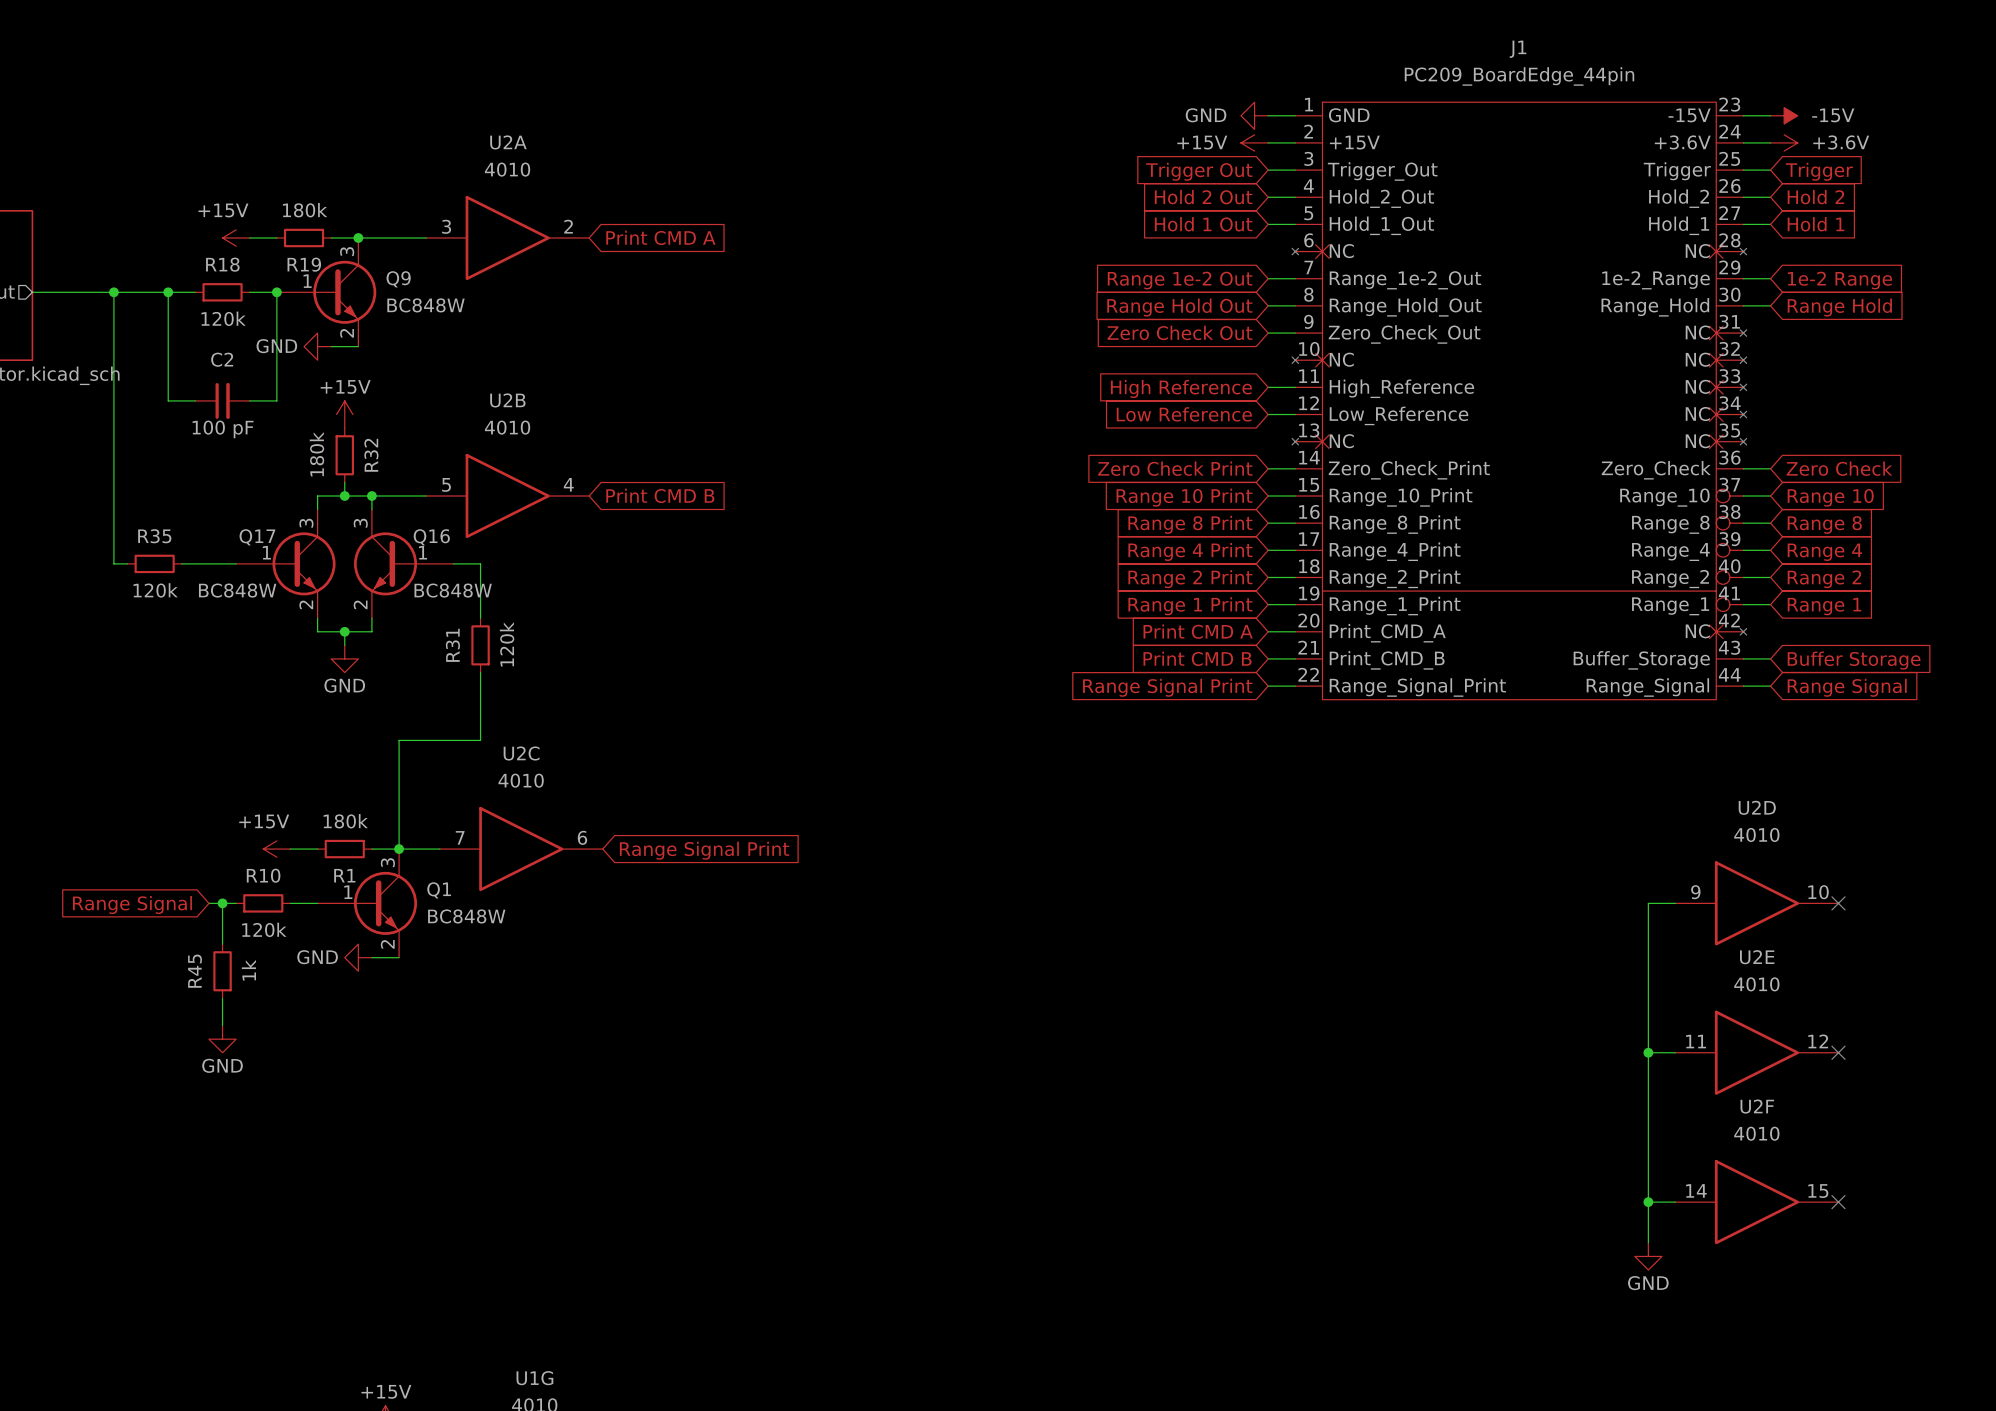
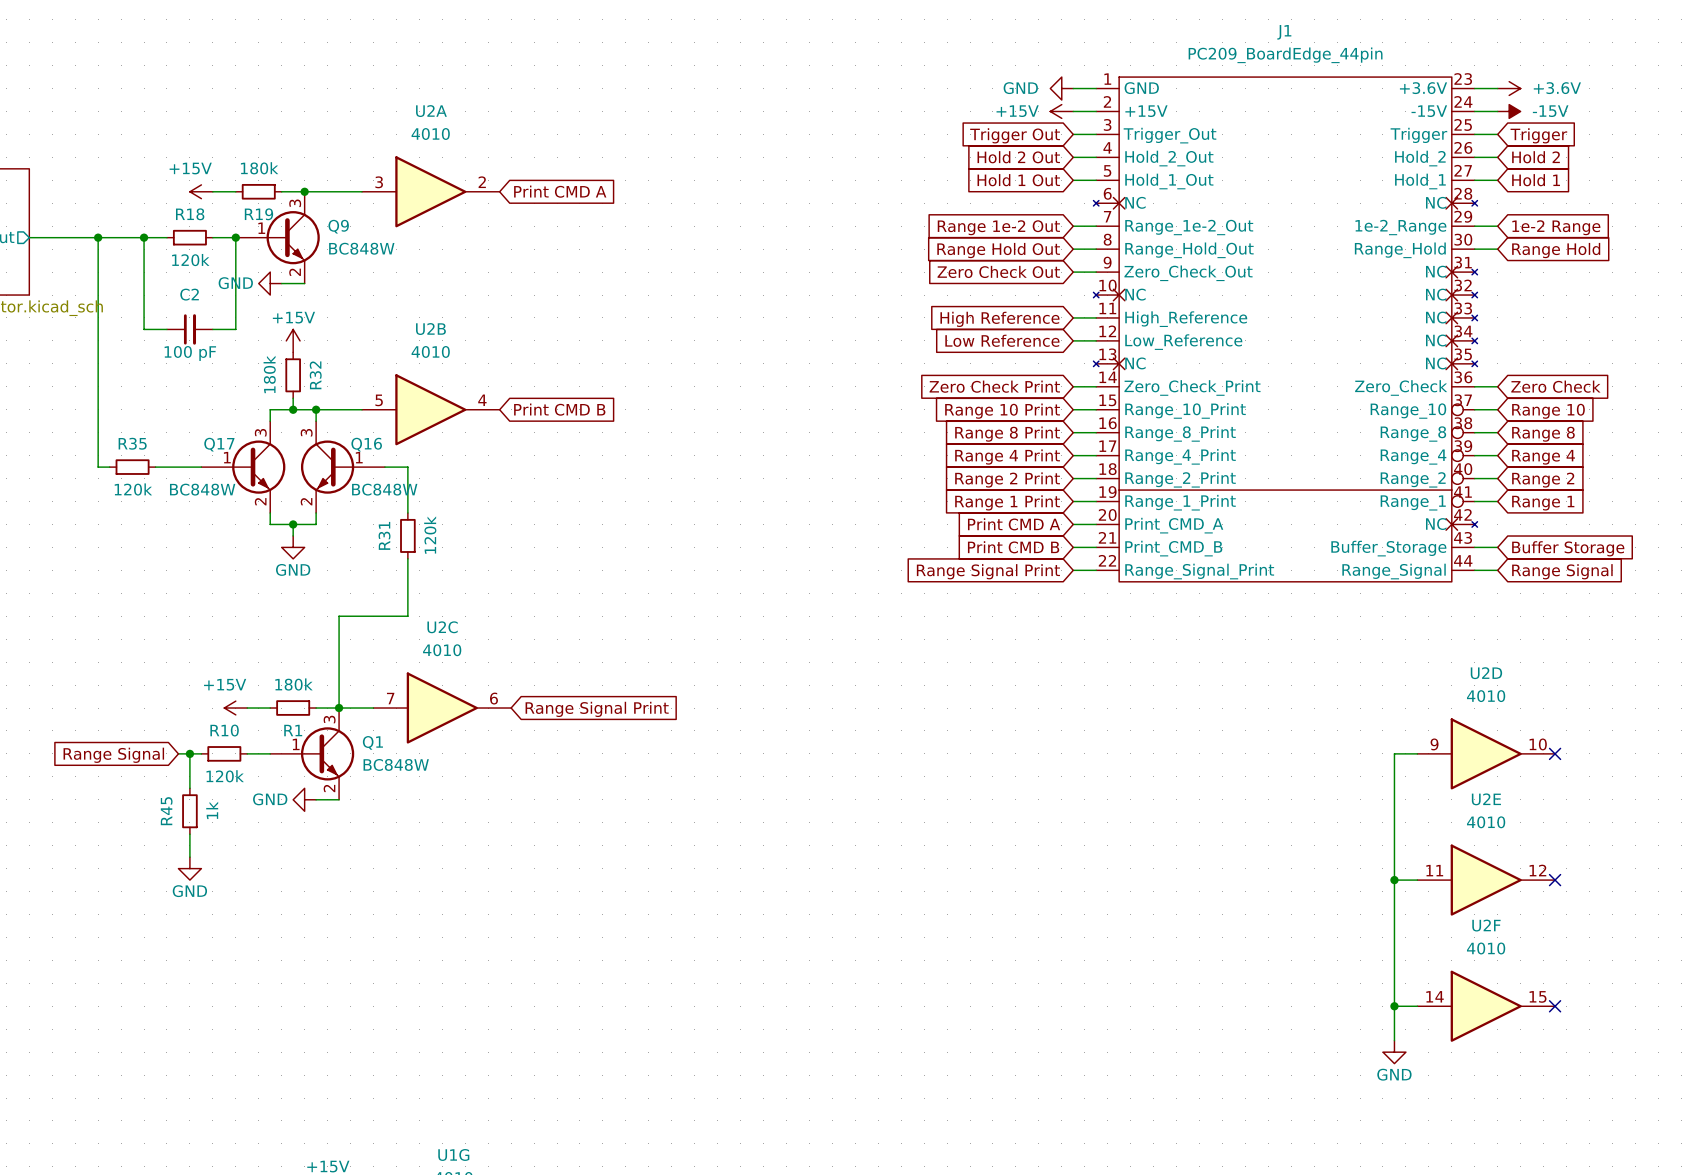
J1 pin name: -15V (1689, 115) -> +3.6V (1423, 88)
power symbol: -15V (1784, 115) -> +3.6V (1509, 88)
J1 pin name: +3.6V (1682, 142) -> -15V (1429, 111)
power symbol: +3.6V (1784, 142) -> -15V (1509, 111)

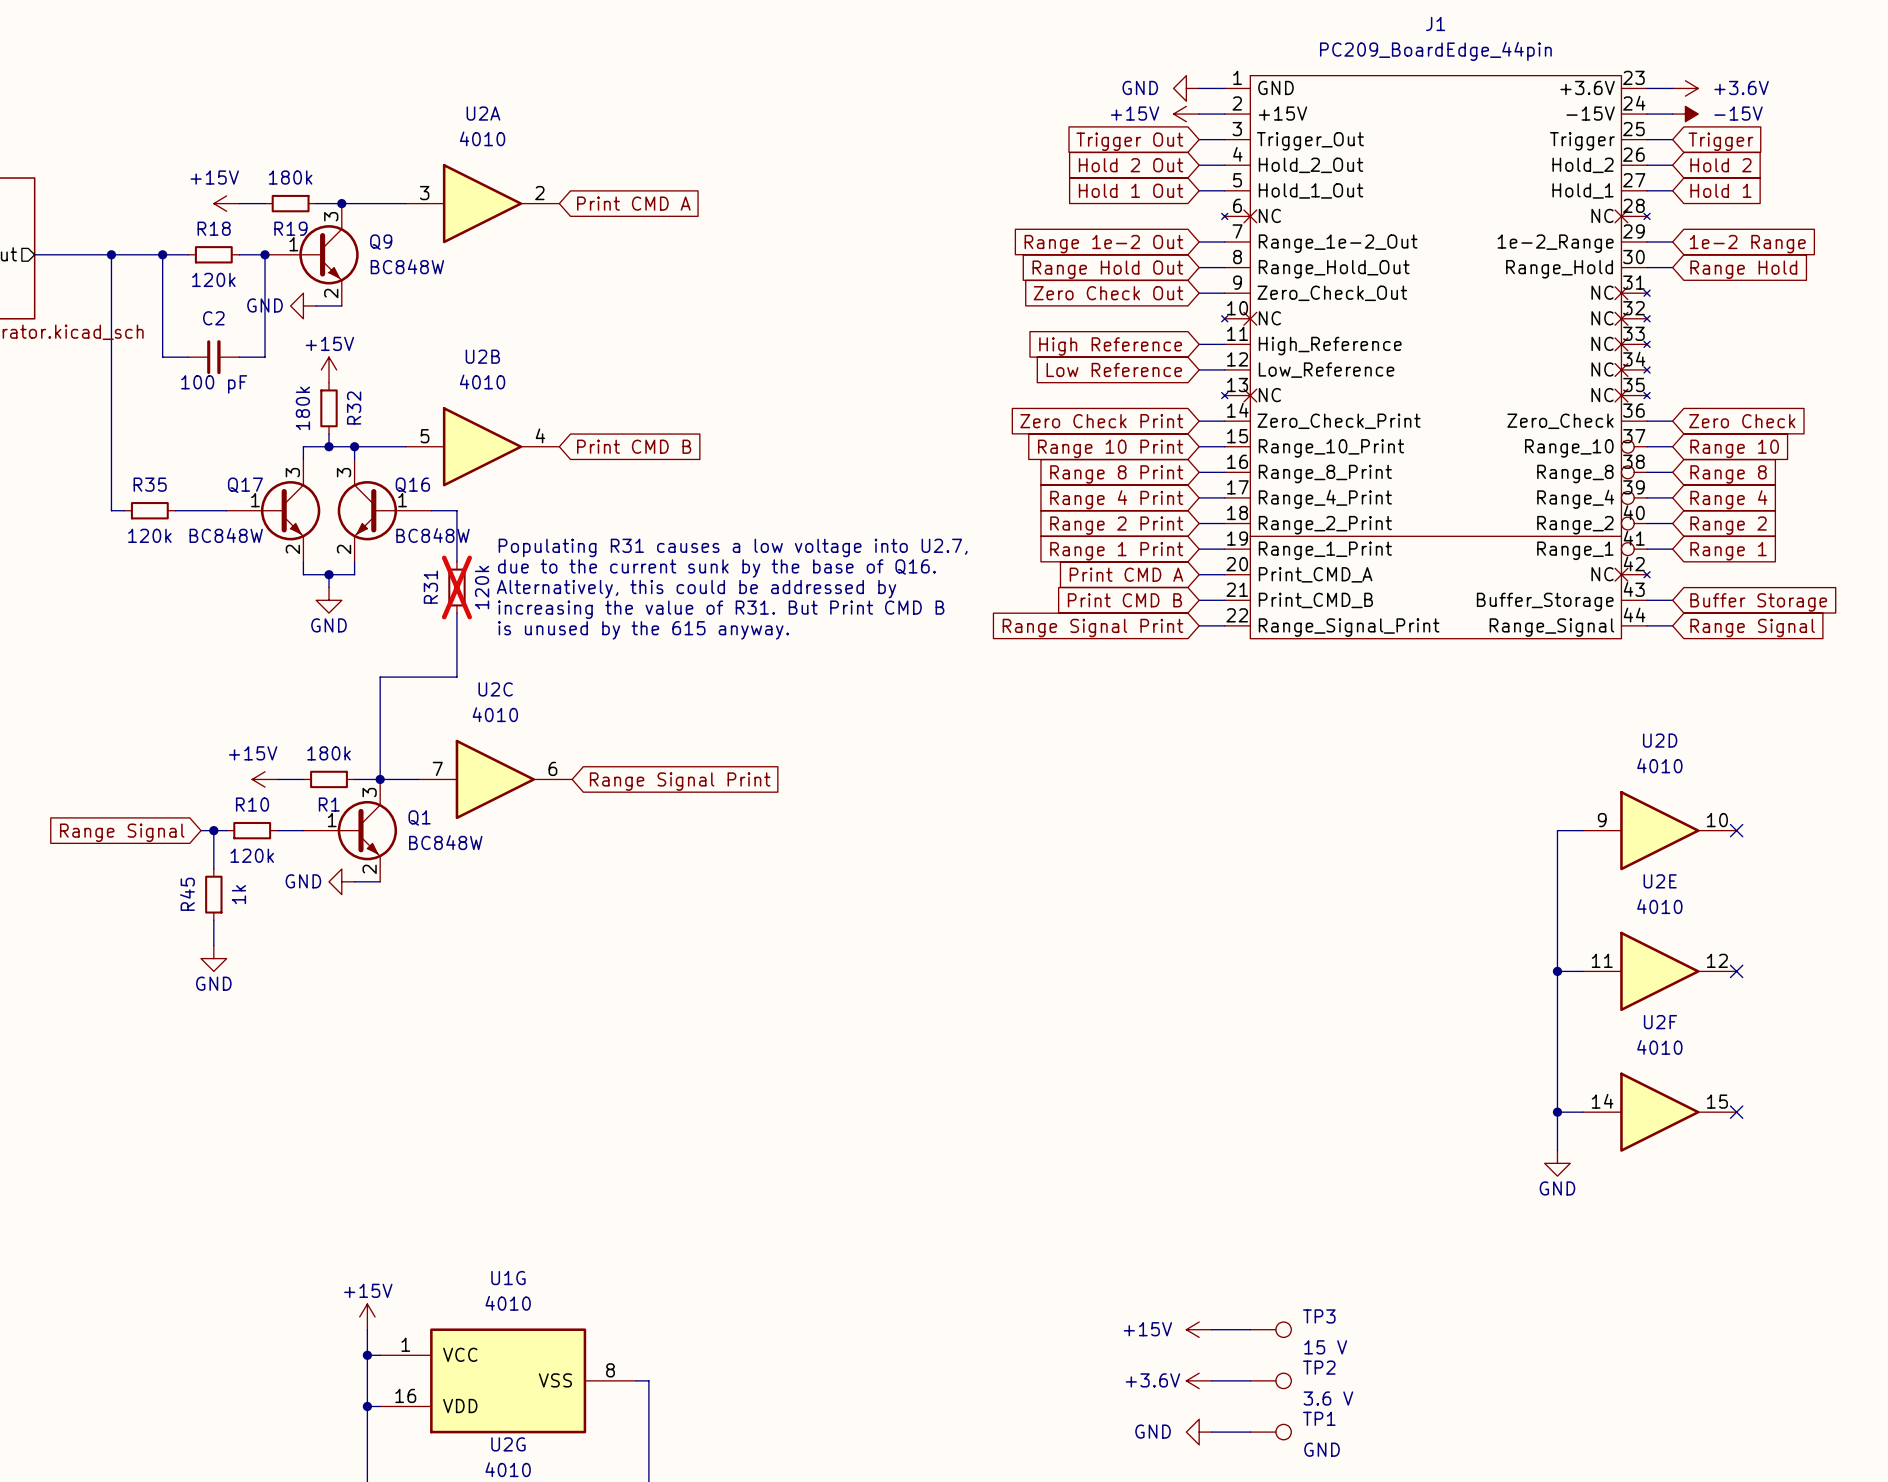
text: none -> Populating R31 causes a low voltage into U2.7, (733, 547)
text: none -> due to the current sunk by the base of Q16. (716, 568)
R31 do-not-place cross: none -> (456, 587)
text: none -> Alternatively, this could be addressed by (696, 589)
text: none -> increasing the value of R31. But Print CMD B (721, 609)
text: none -> is unused by the 615 anyway. (643, 630)

